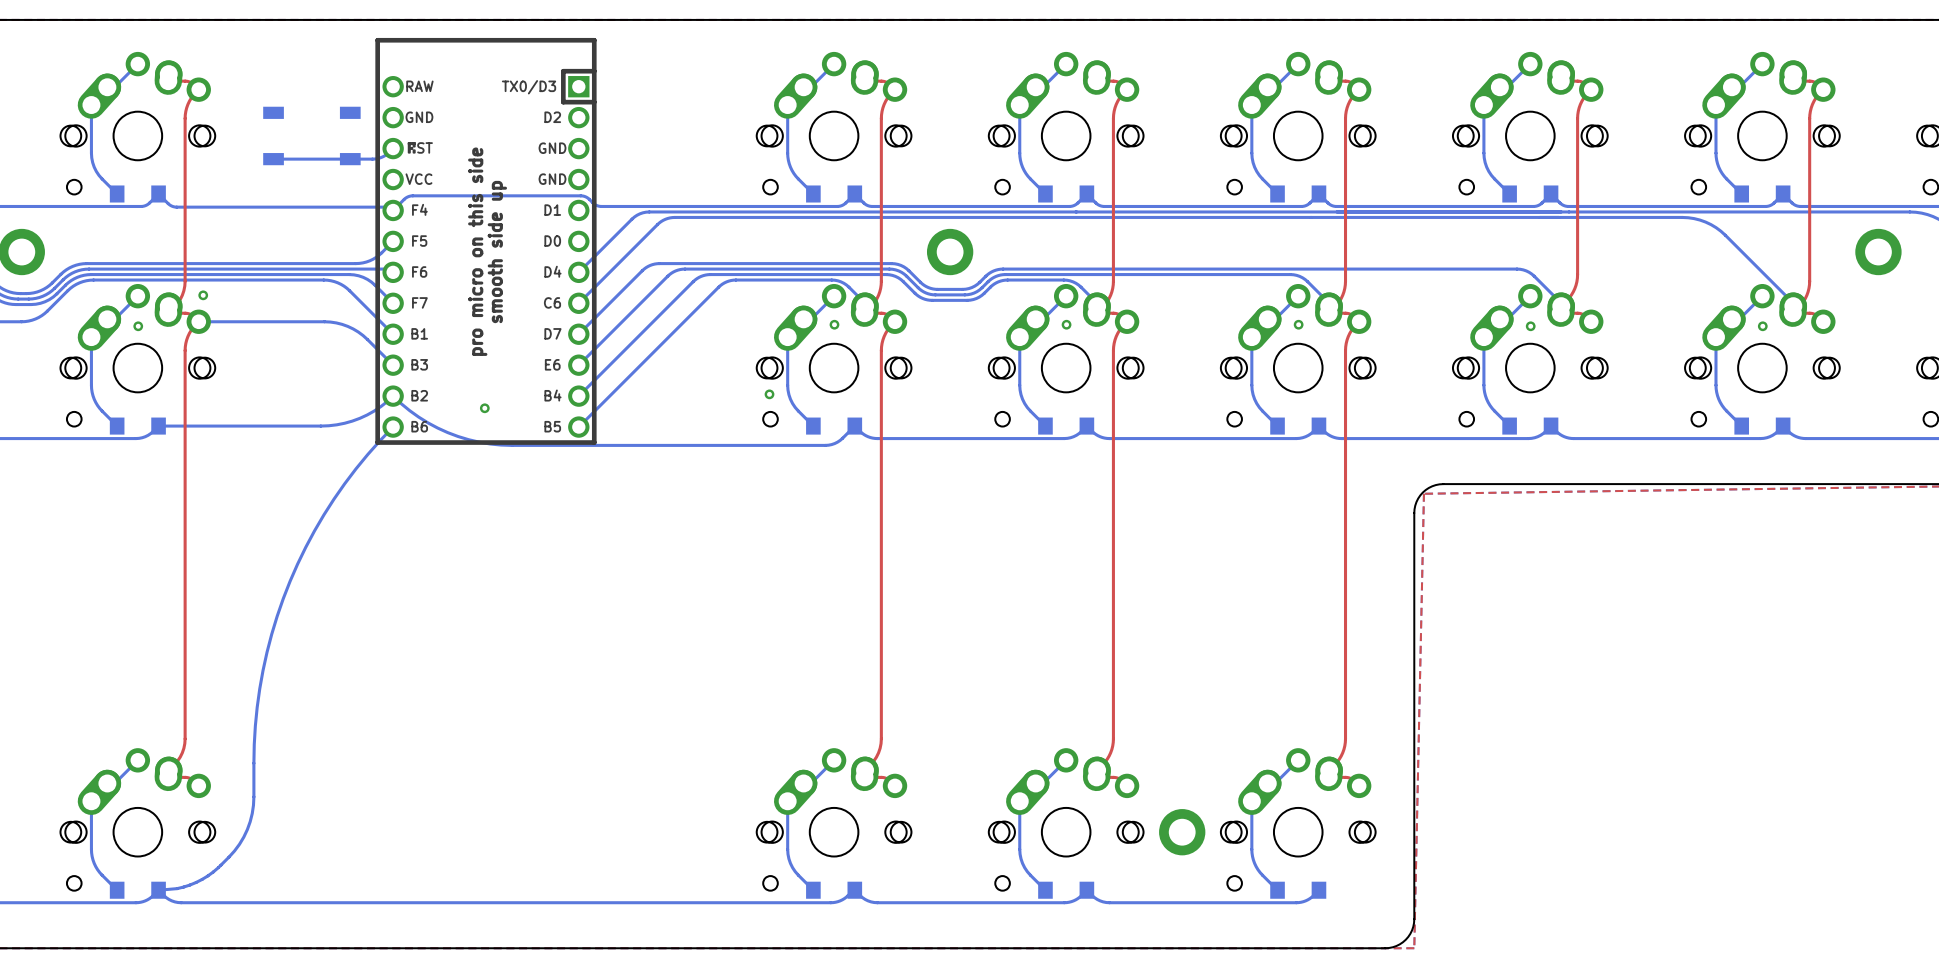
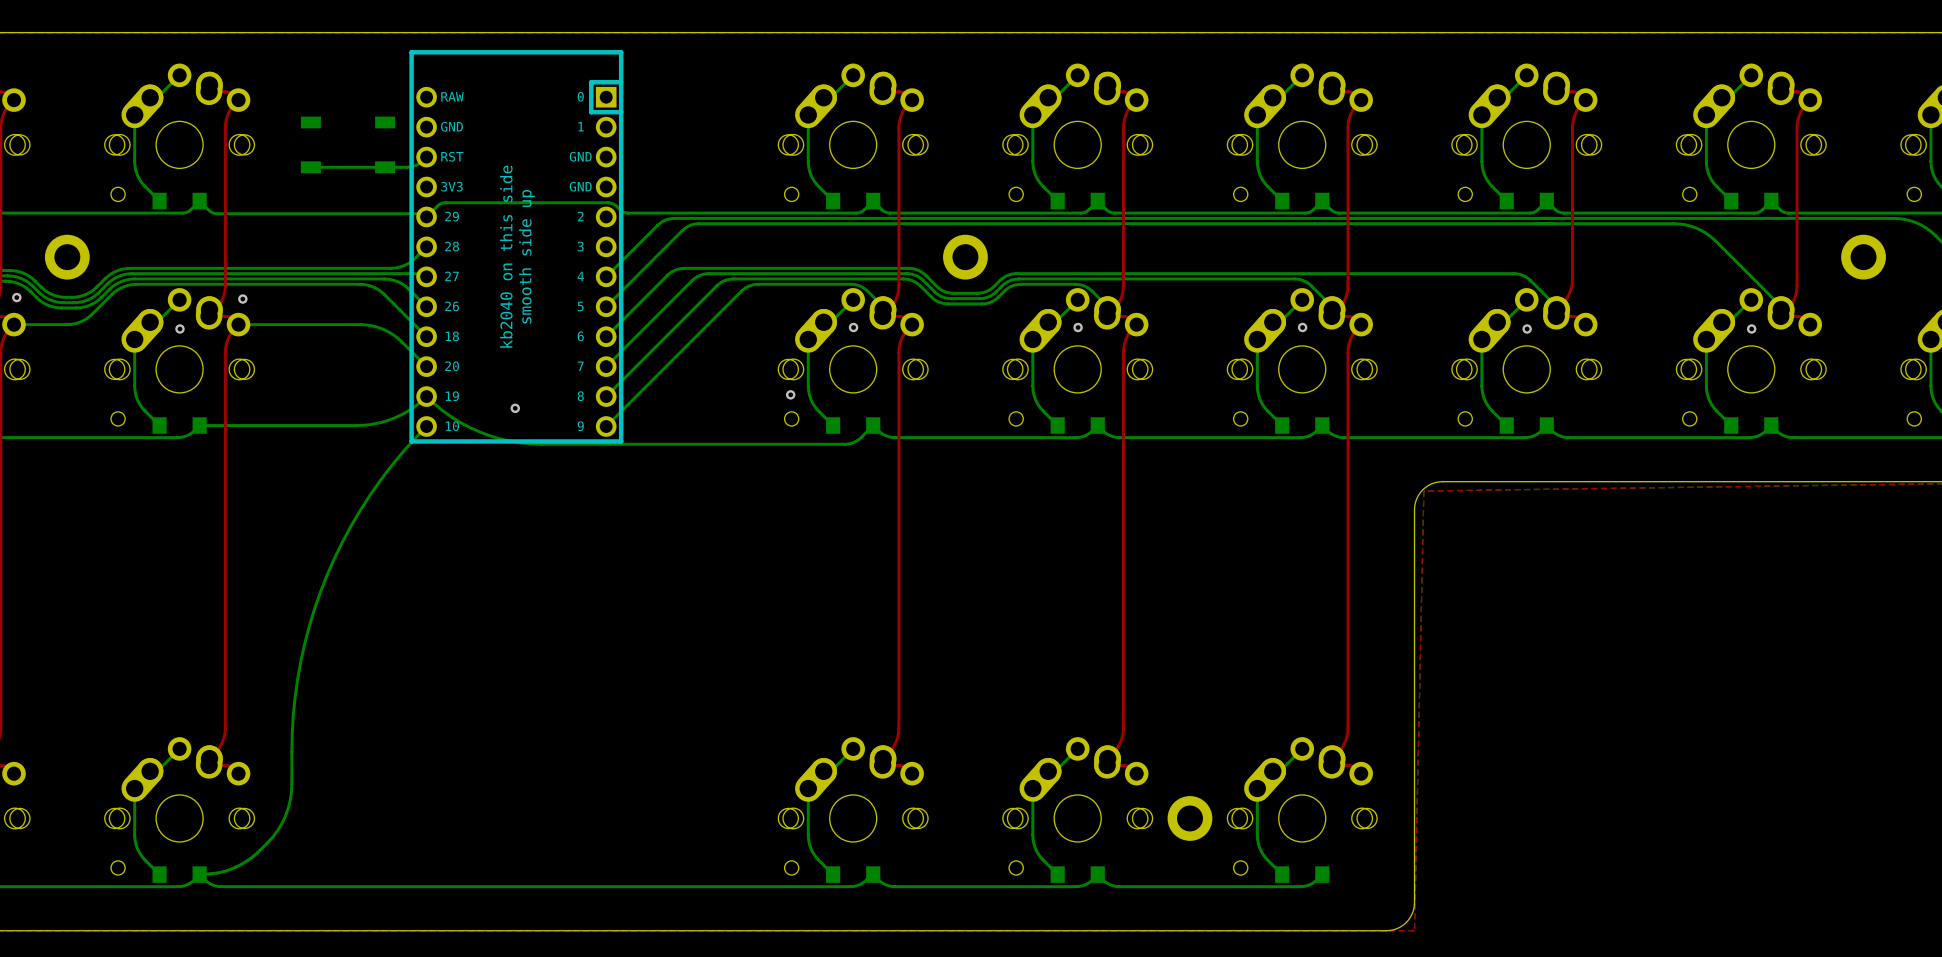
part footprint: [375, 37, 597, 445] -> [409, 50, 624, 444]
text: pro micro on this side (477, 251) -> kb2040 on this side (506, 256)

